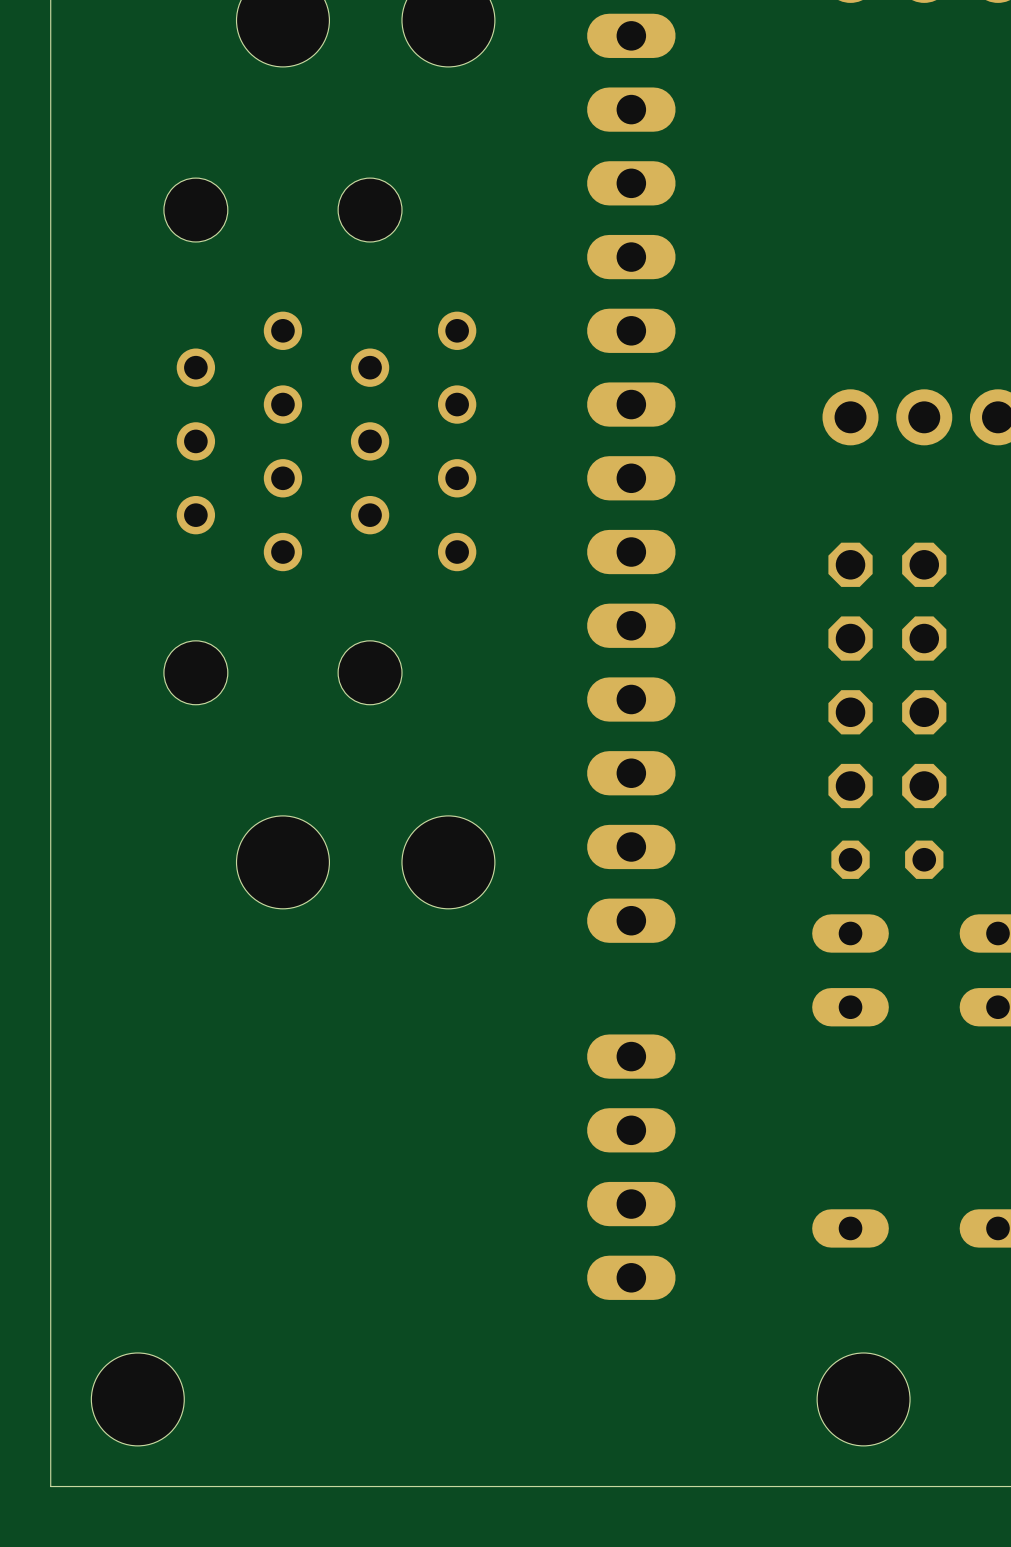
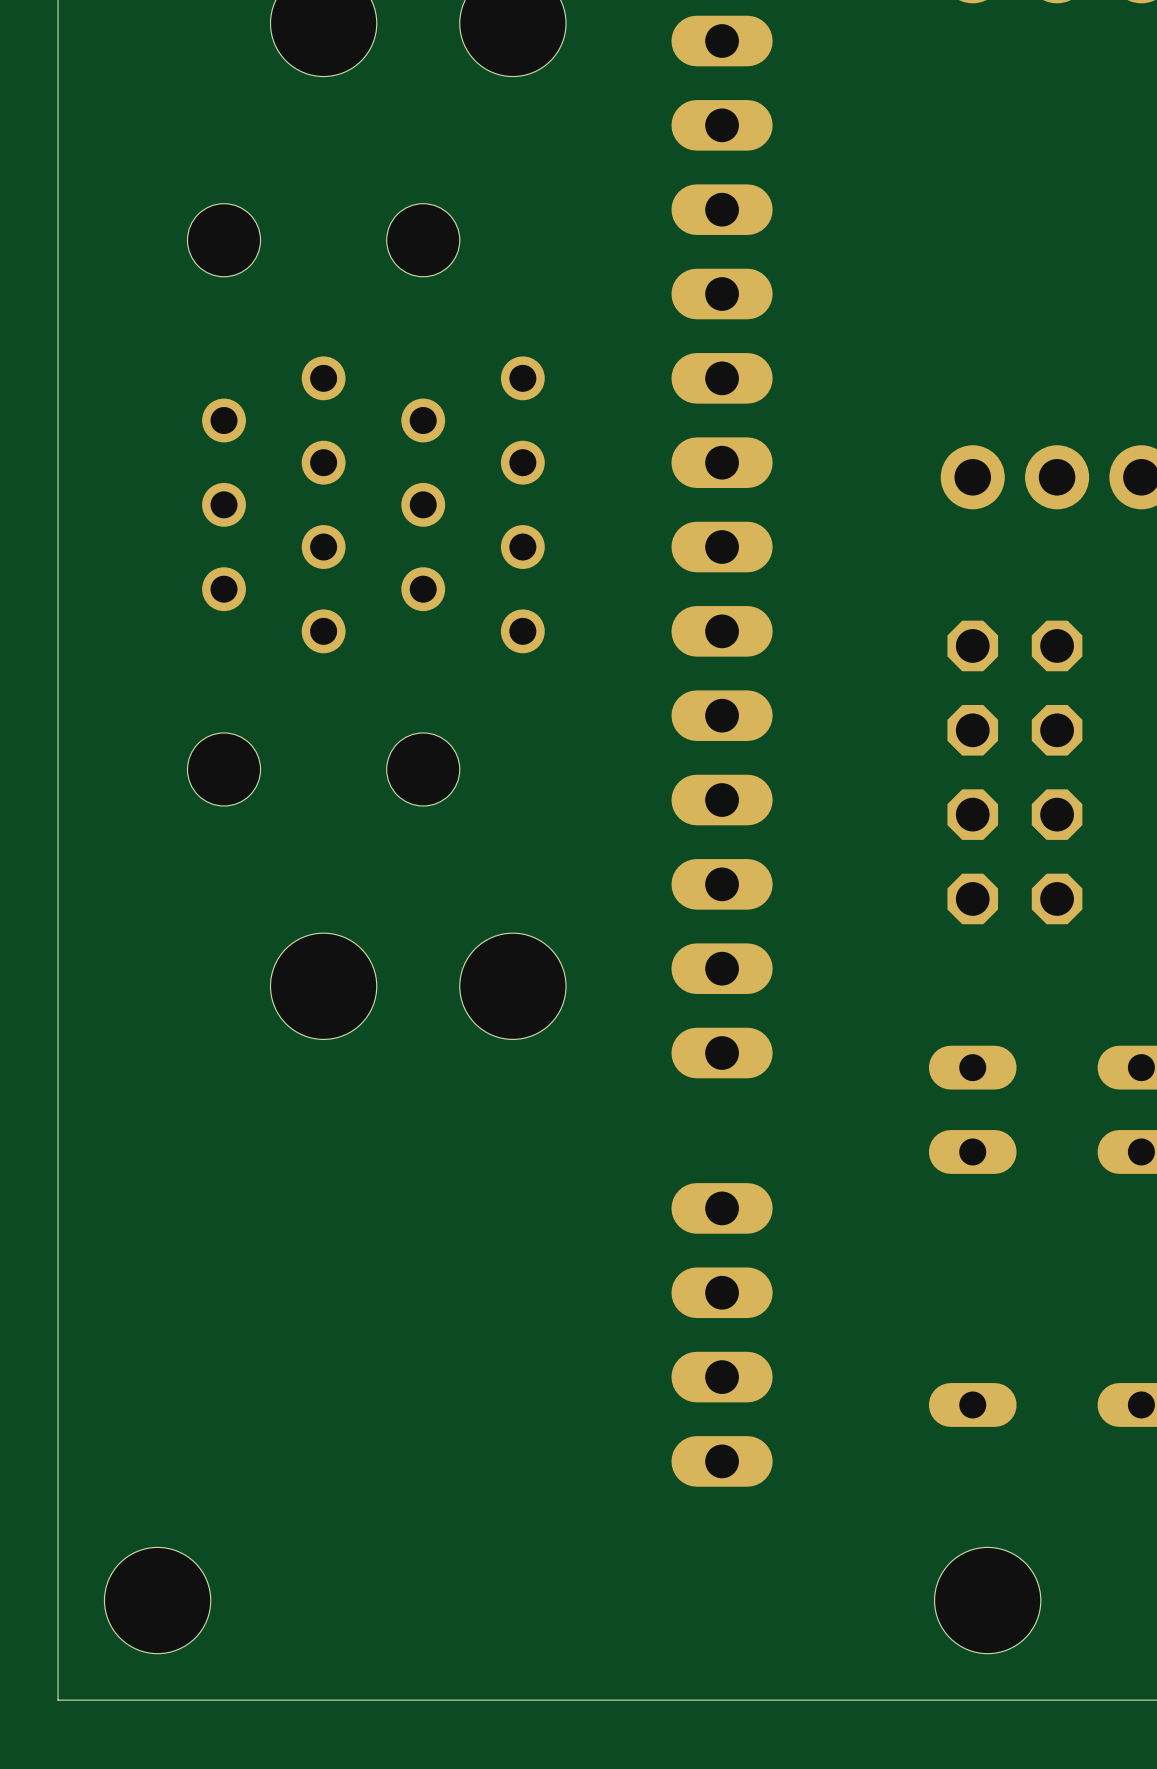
part: (887, 859) -> none

